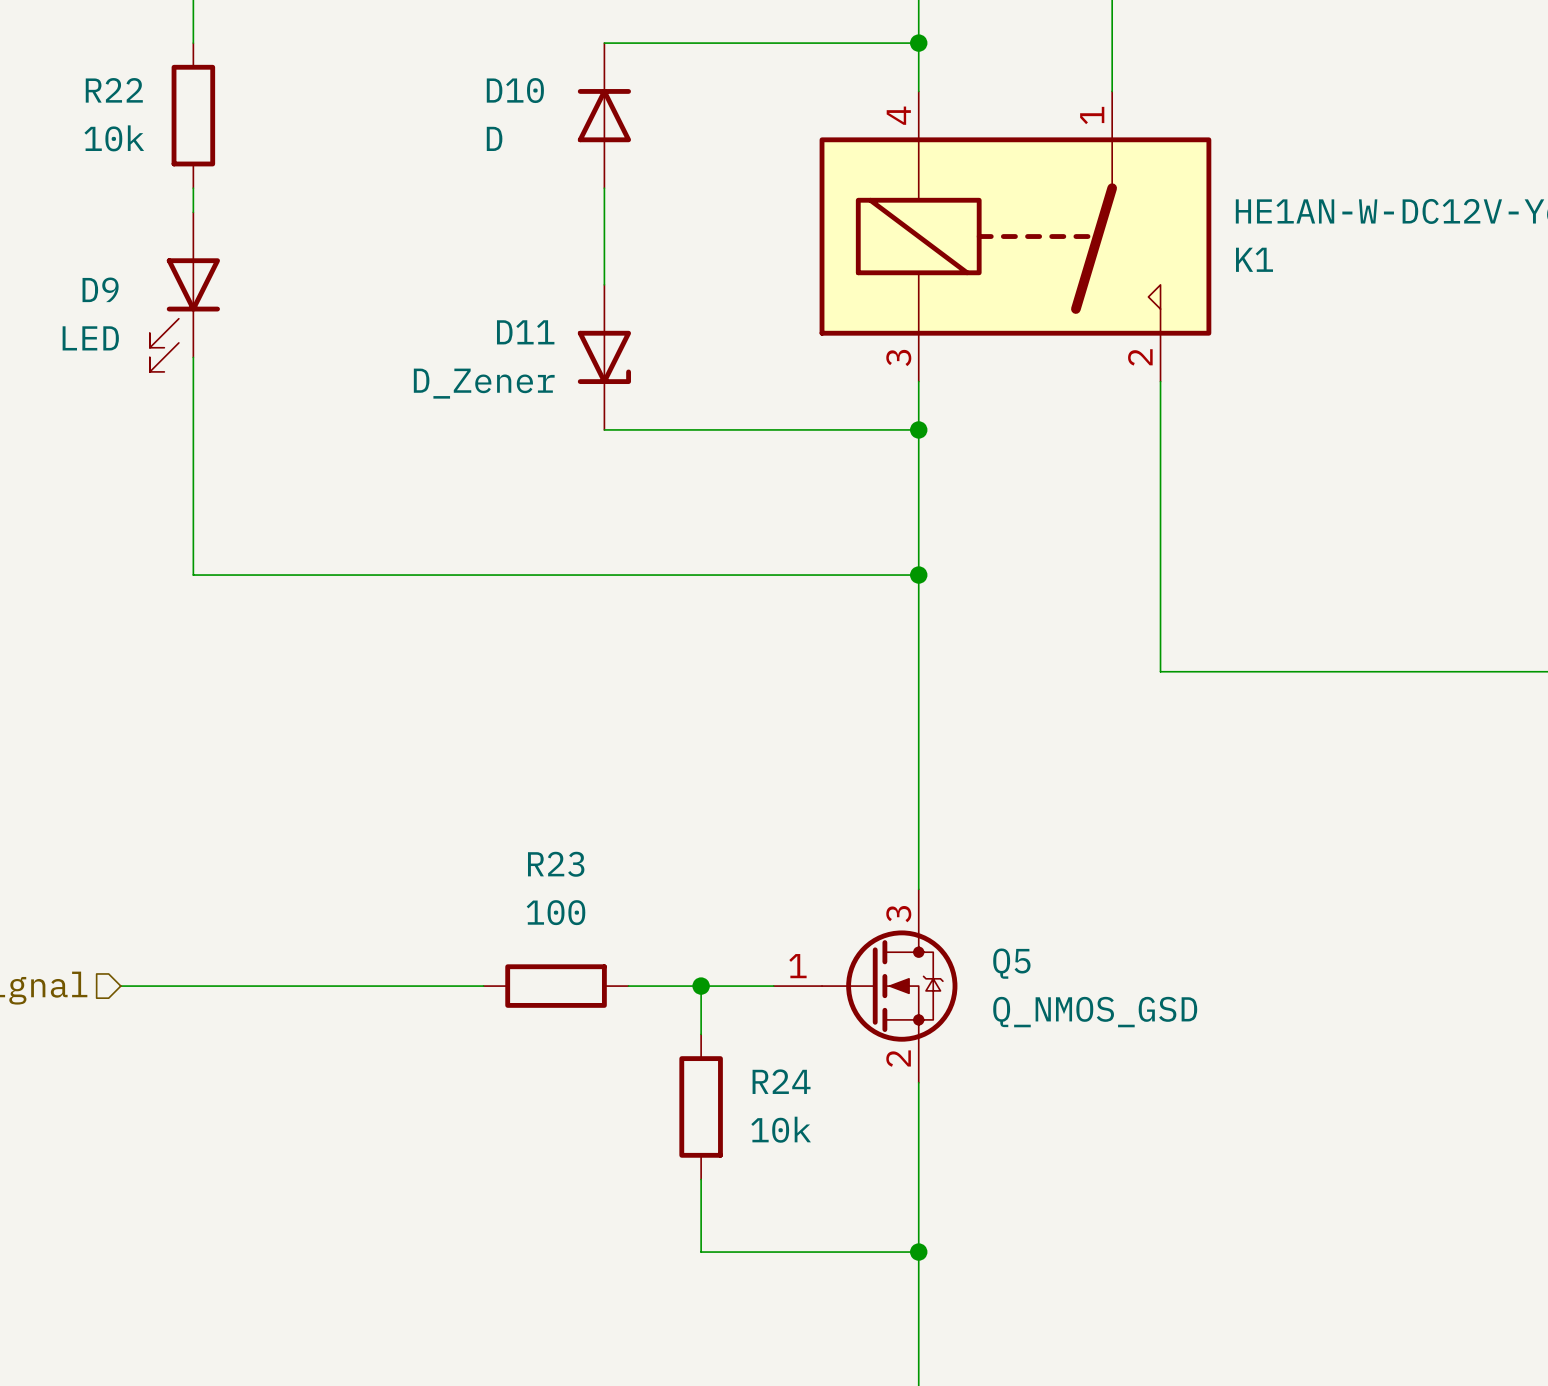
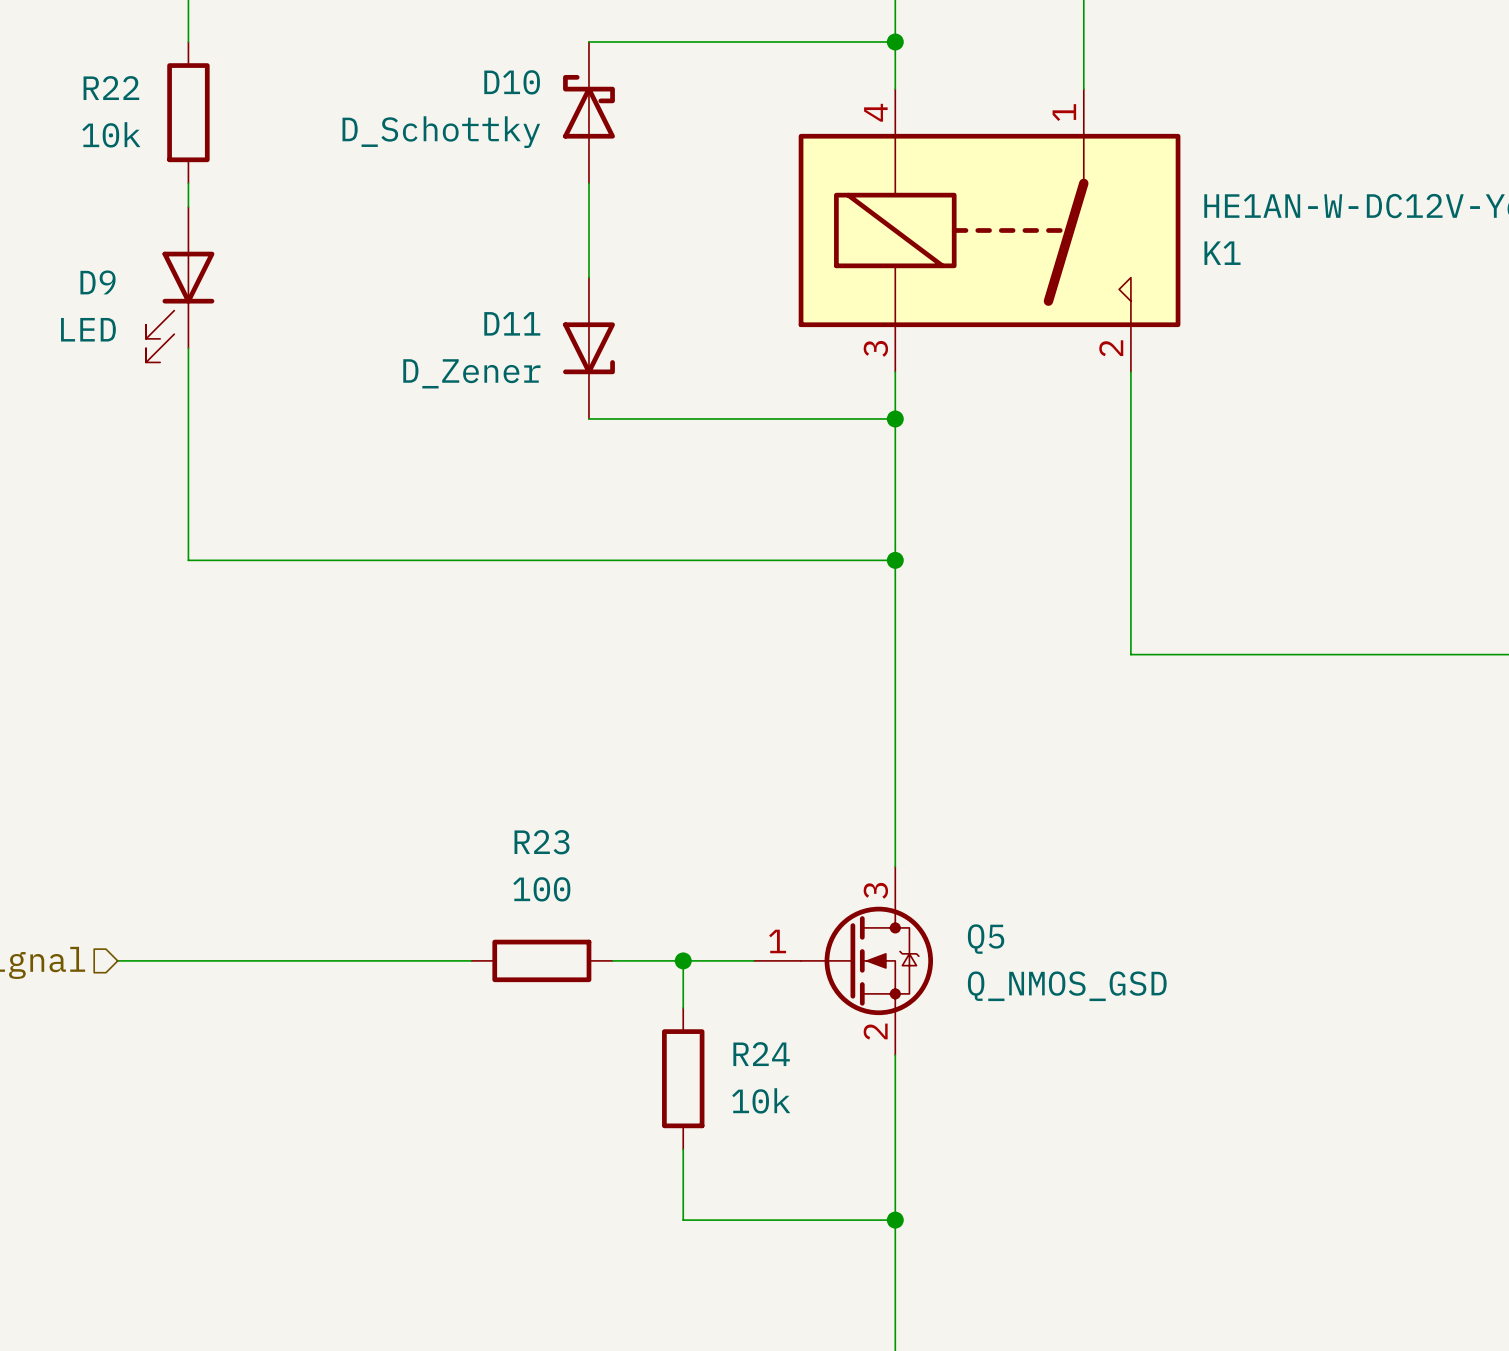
D10 symbol: [577, 43, 632, 189] -> [563, 41, 615, 184]
D10 name position: D10 (515, 90) -> D10 (512, 82)
D10 value: D (494, 138) -> D_Schottky (441, 132)

